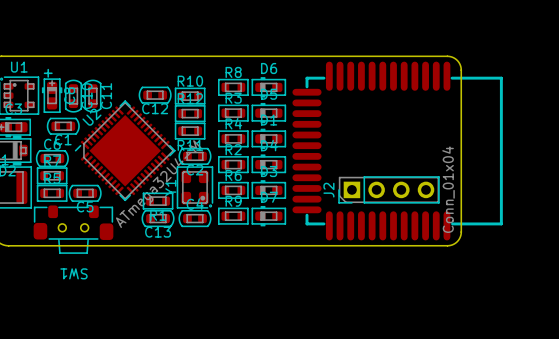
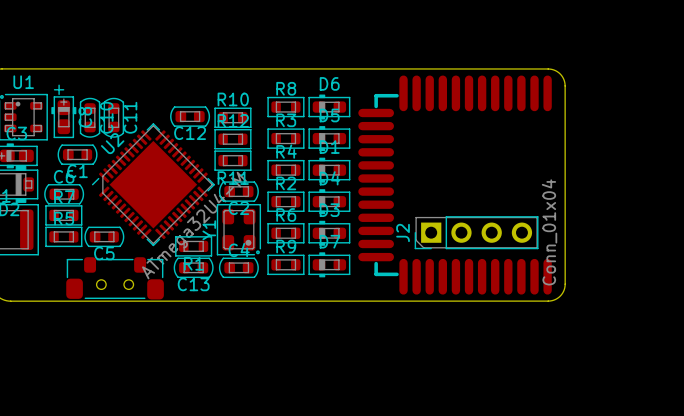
part: none -> (455, 185)
part: (397, 151) -> none
part: none -> (115, 278)
SW1: (73, 229) -> none

